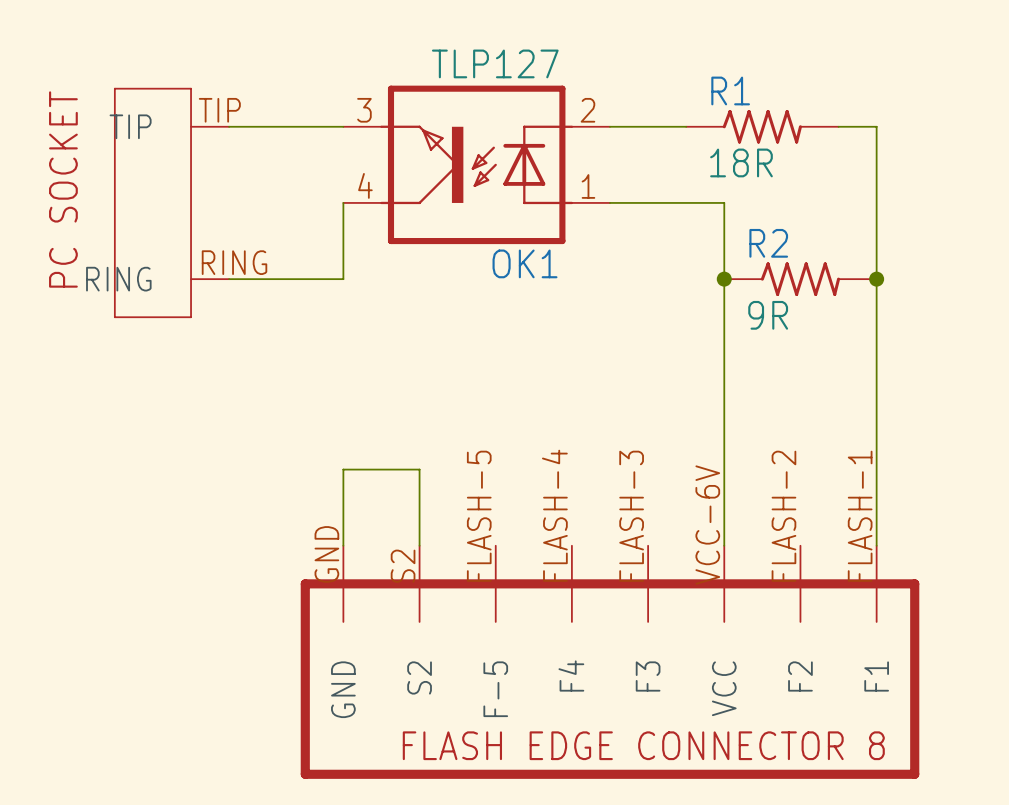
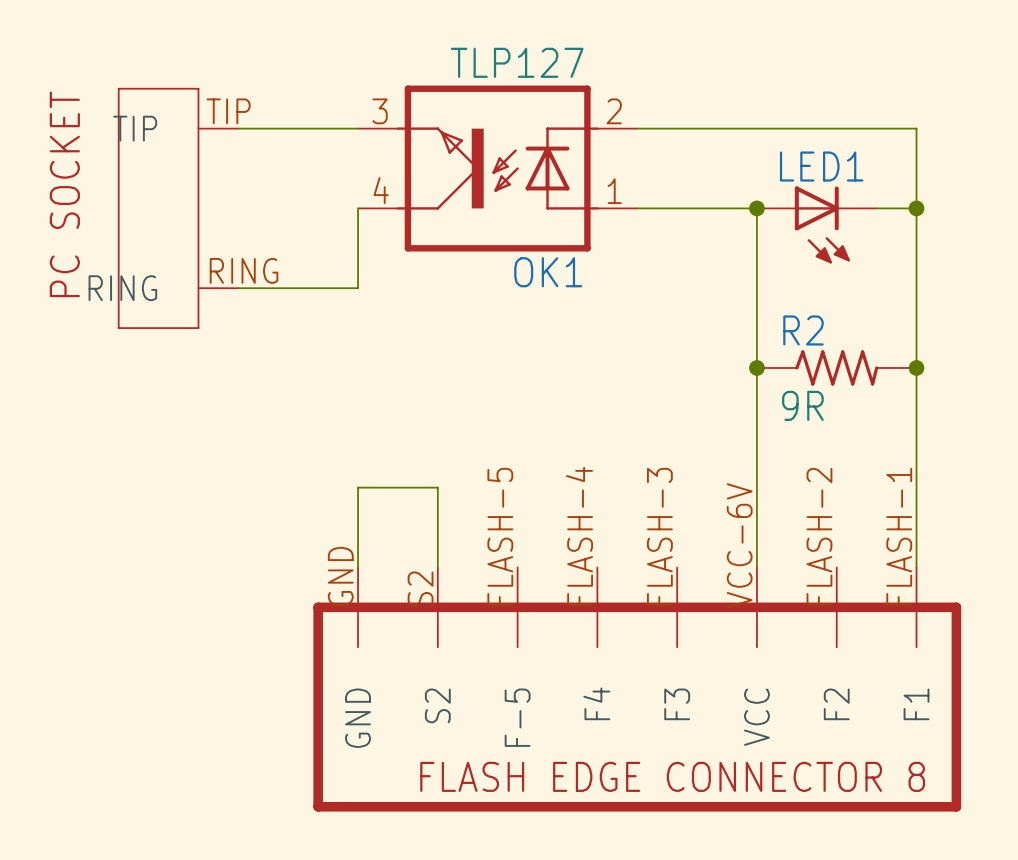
R1: 18R (762, 126) -> none
junction: none -> (756, 208)
wire: none -> (876, 208) (916, 208)
junction: none -> (916, 208)
LED1: none -> (816, 224)
junction: (724, 279) -> none
R2 position: (800, 279) -> (836, 367)
junction: (876, 279) -> none
junction: none -> (756, 367)
junction: none -> (916, 367)

